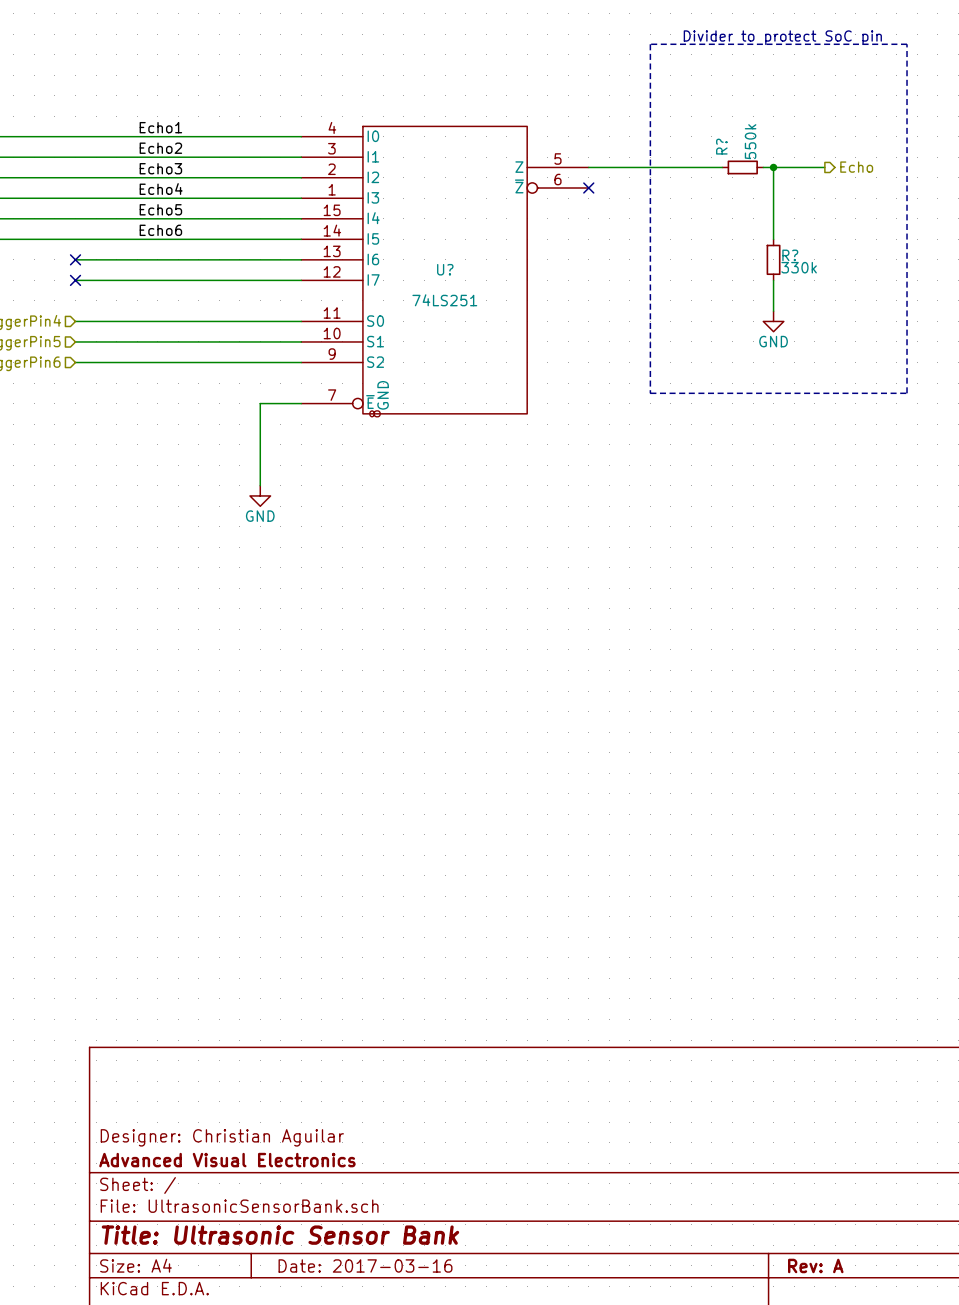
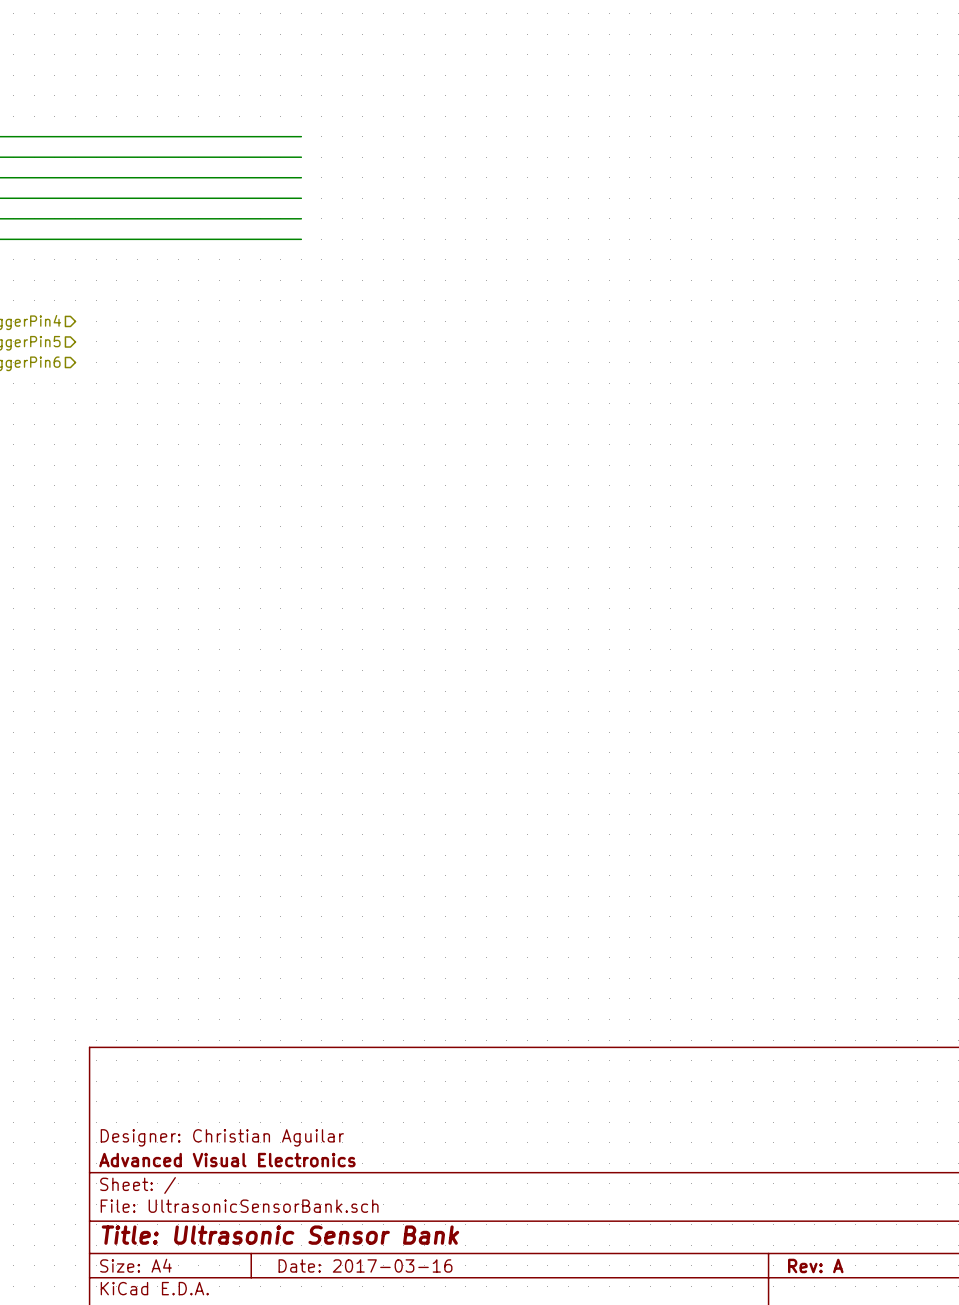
text: Divider to protect SoC pin (782, 37) -> none
line: (650, 44) (650, 393) (907, 393) (907, 44) (650, 44) -> none
label: Echo1 (160, 127) -> none
label: Echo2 (160, 148) -> none
wire: (588, 167) (722, 167) -> none
R?: 550k (742, 167) -> none
wire: (763, 167) (824, 167) -> none
wire: (773, 167) (773, 239) -> none
junction: (773, 167) -> none
hierarchical label: Echo (856, 167) -> none
label: Echo3 (160, 168) -> none
no-connect mark: (588, 188) -> none
label: Echo4 (161, 189) -> none
label: Echo5 (160, 209) -> none
label: Echo6 (160, 230) -> none
wire: (75, 259) (301, 259) -> none
no-connect mark: (75, 259) -> none
R?: 330k (773, 259) -> none
U?: 74LS251 (445, 270) -> none
wire: (75, 280) (301, 280) -> none
no-connect mark: (75, 280) -> none
wire: (773, 280) (773, 311) -> none
wire: (75, 321) (301, 321) -> none
power symbol: GND (773, 321) -> none
wire: (75, 341) (301, 341) -> none
wire: (75, 362) (301, 362) -> none
wire: (301, 403) (260, 403) (260, 485) -> none
power symbol: GND (260, 495) -> none

